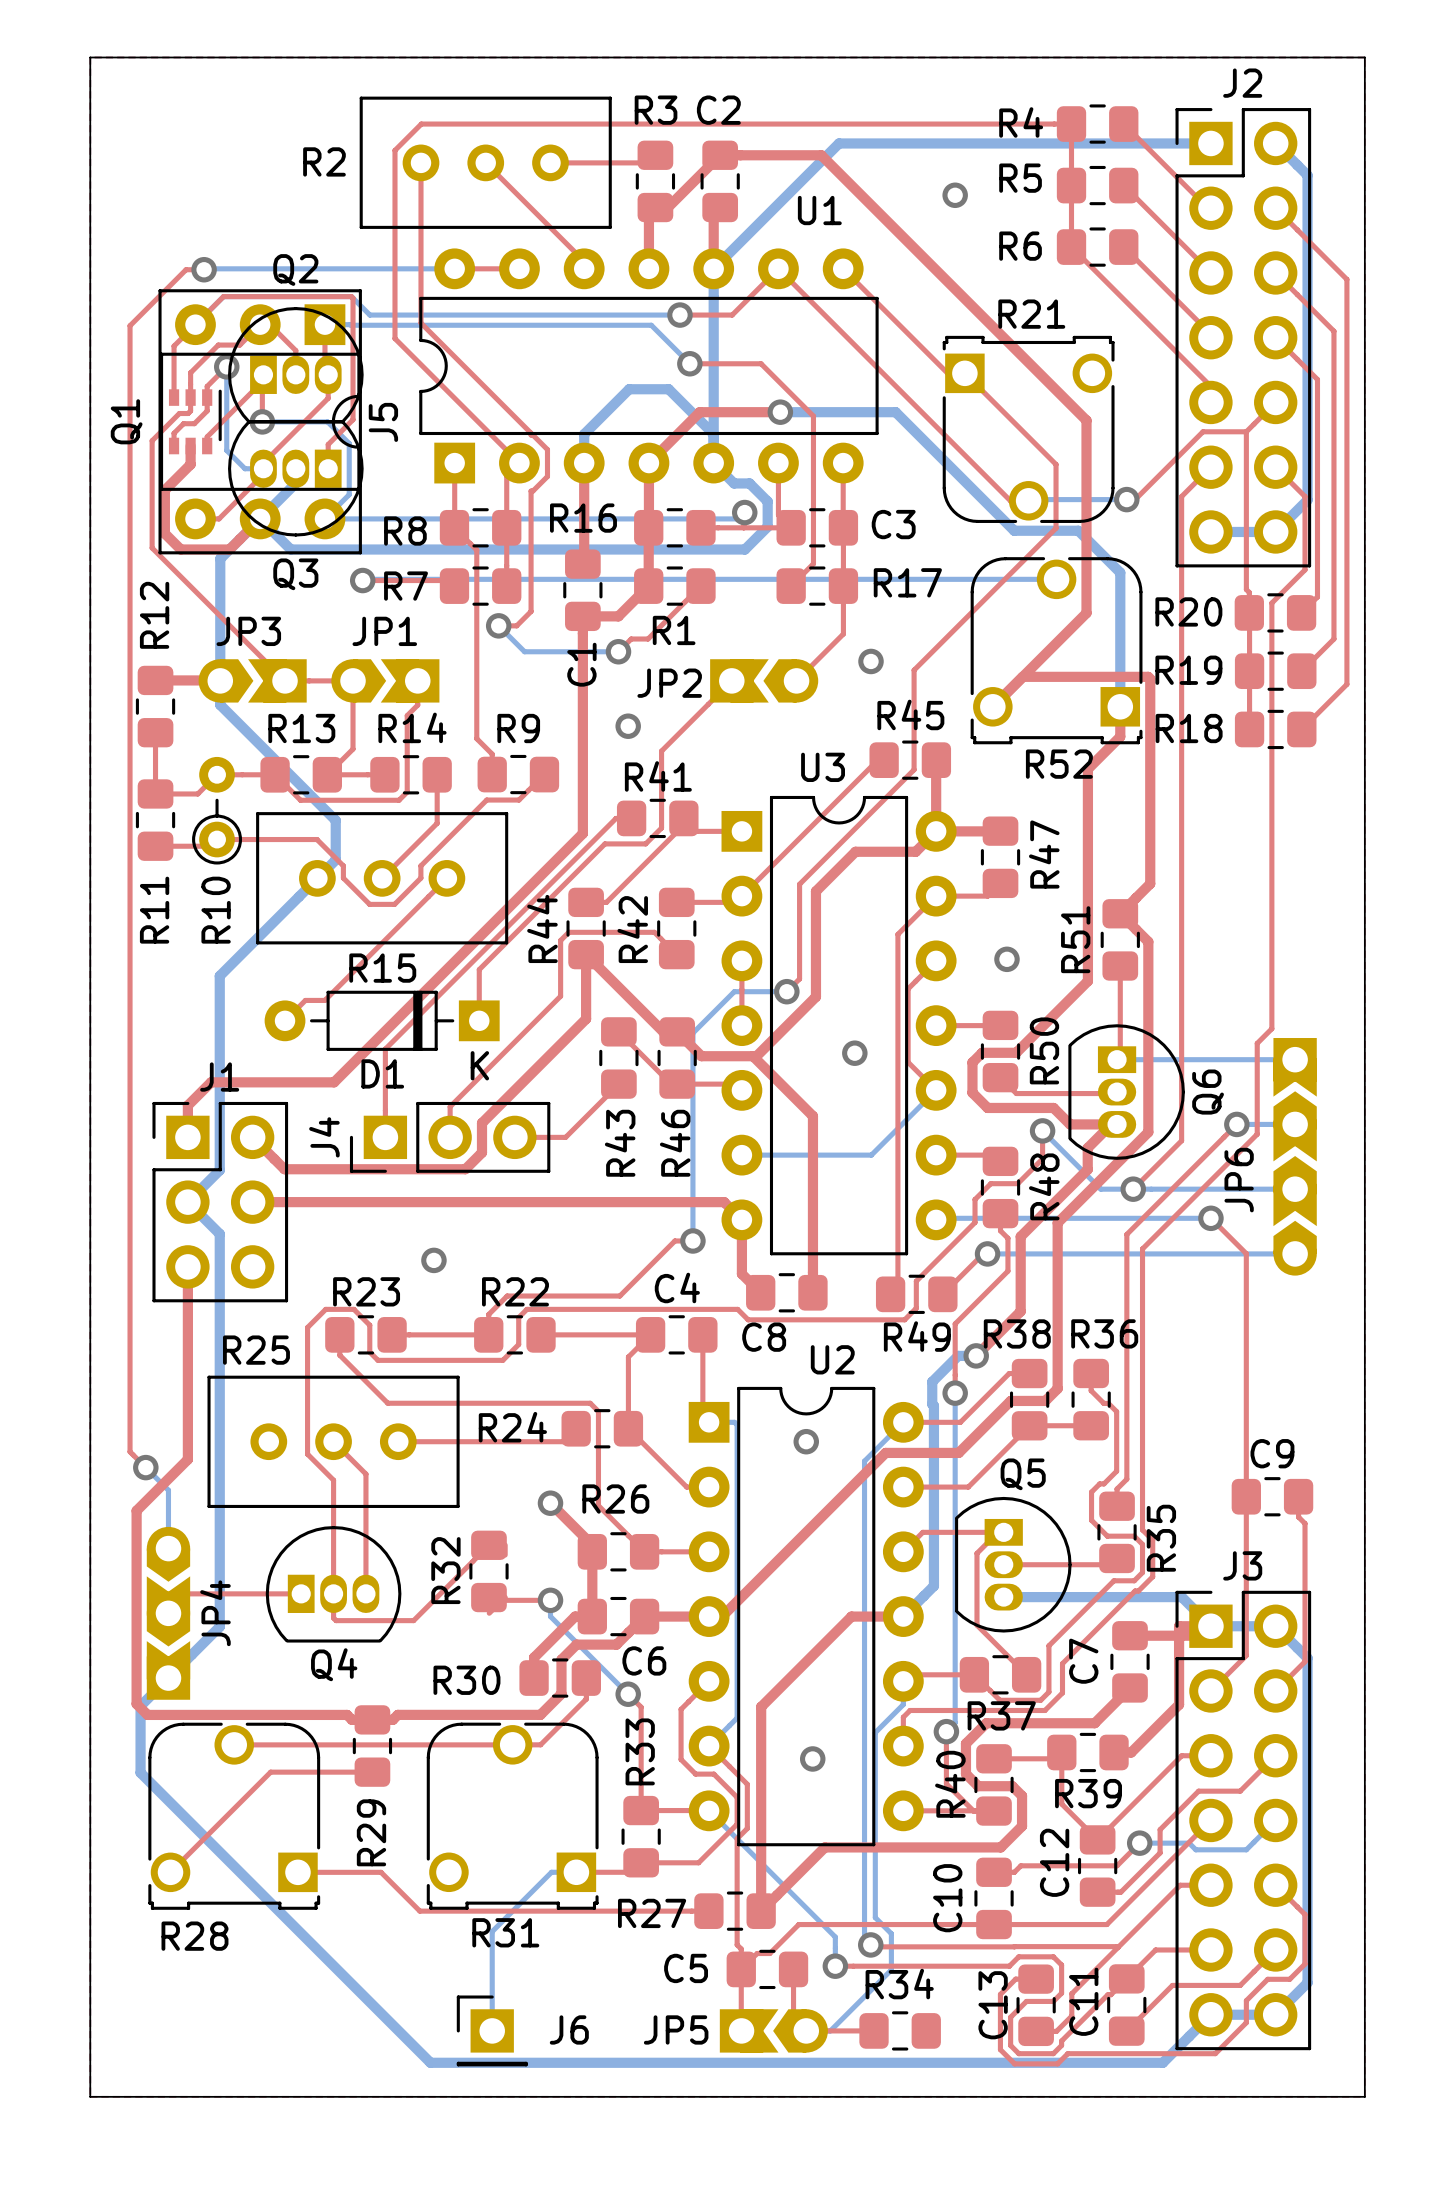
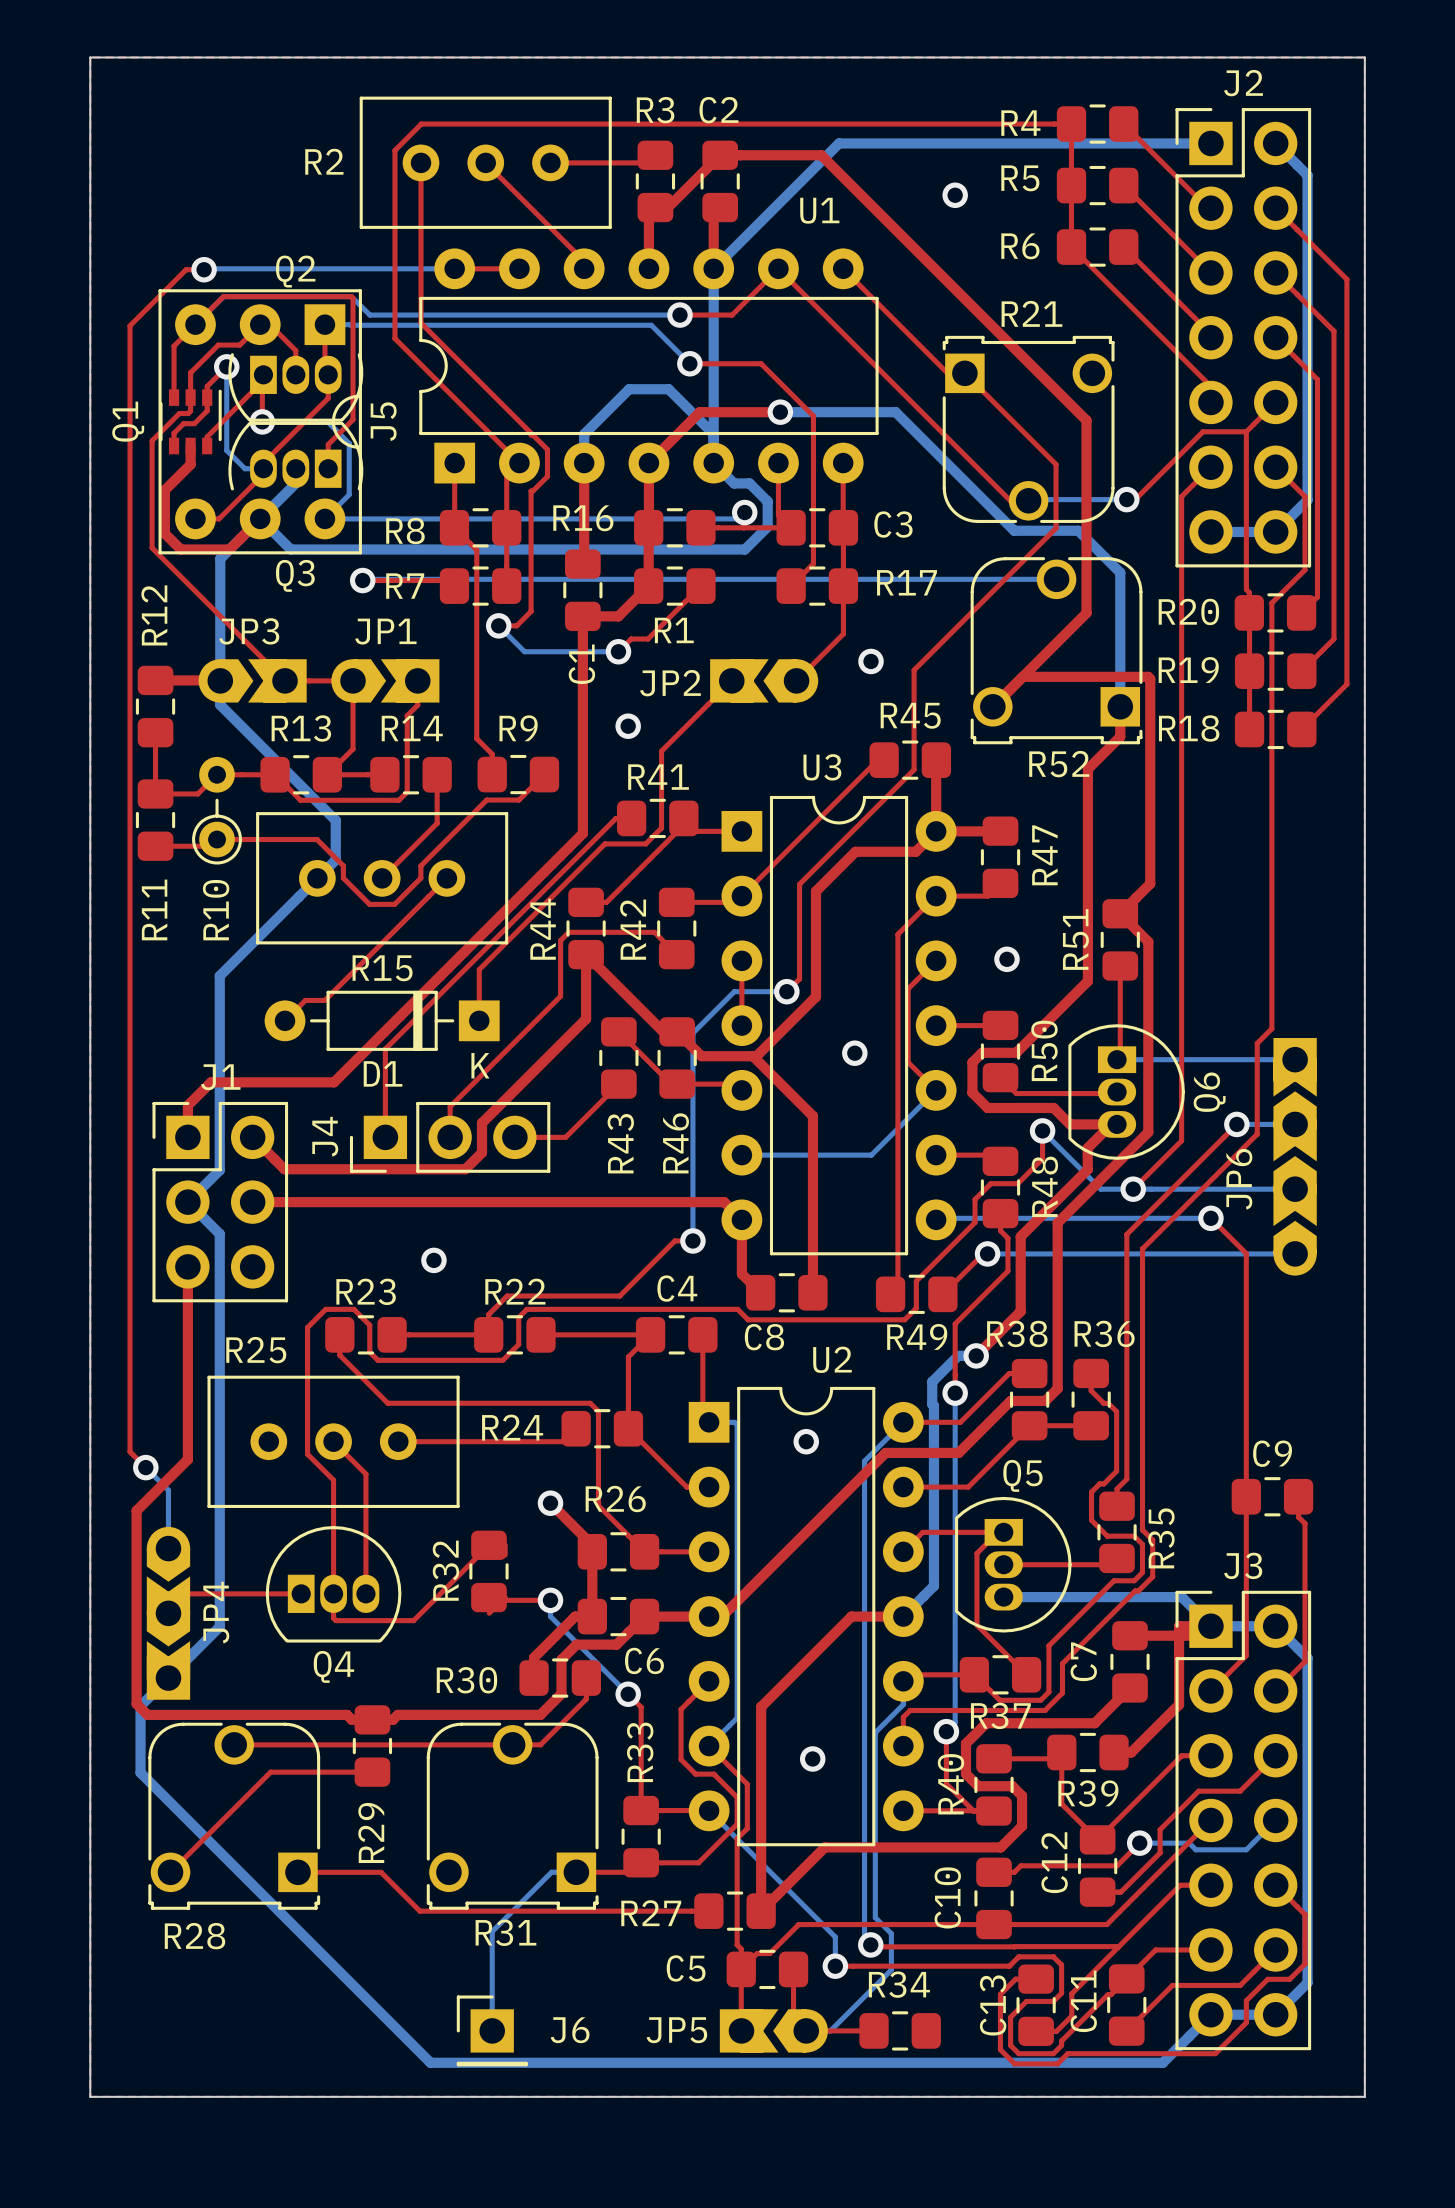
J5 footprint: [158, 289, 362, 555] -> [158, 289, 362, 555]
Q2 footprint: [228, 307, 364, 424] -> [228, 353, 364, 422]
Q3 footprint: [228, 420, 364, 537] -> [228, 421, 364, 491]

